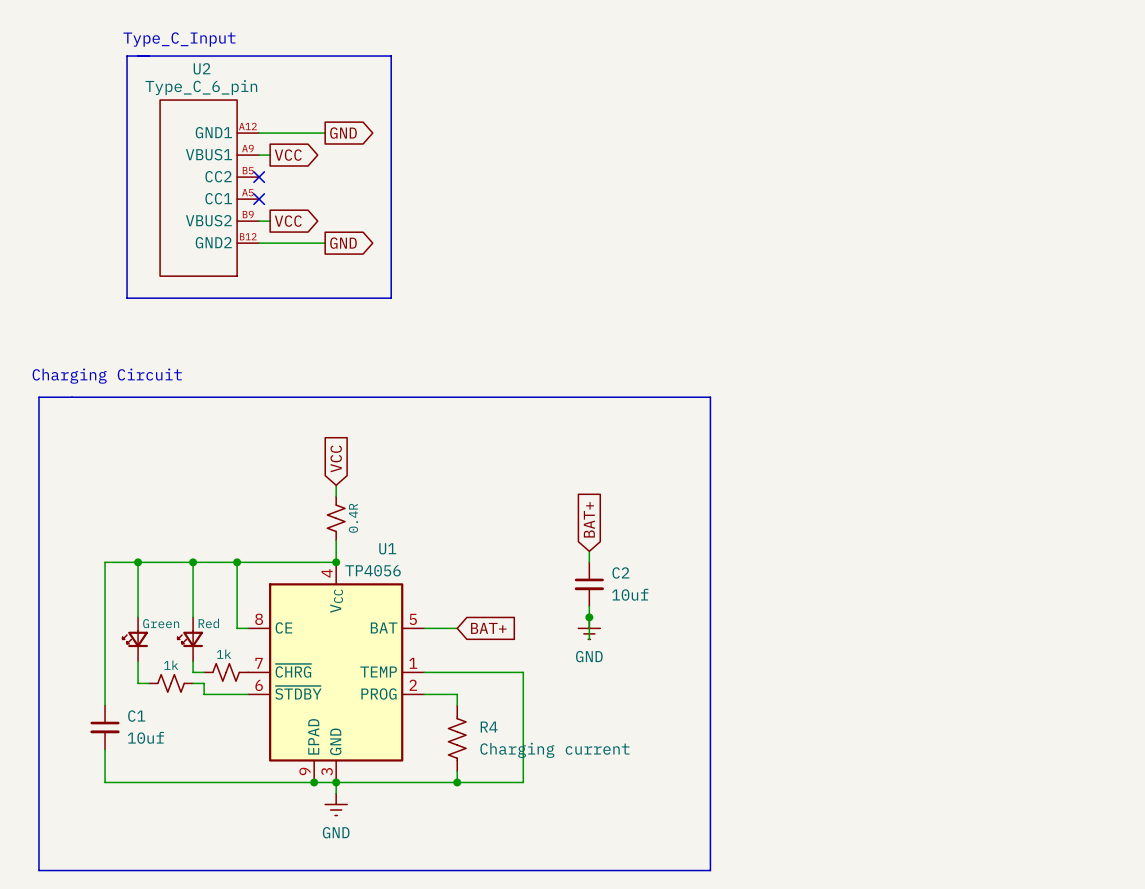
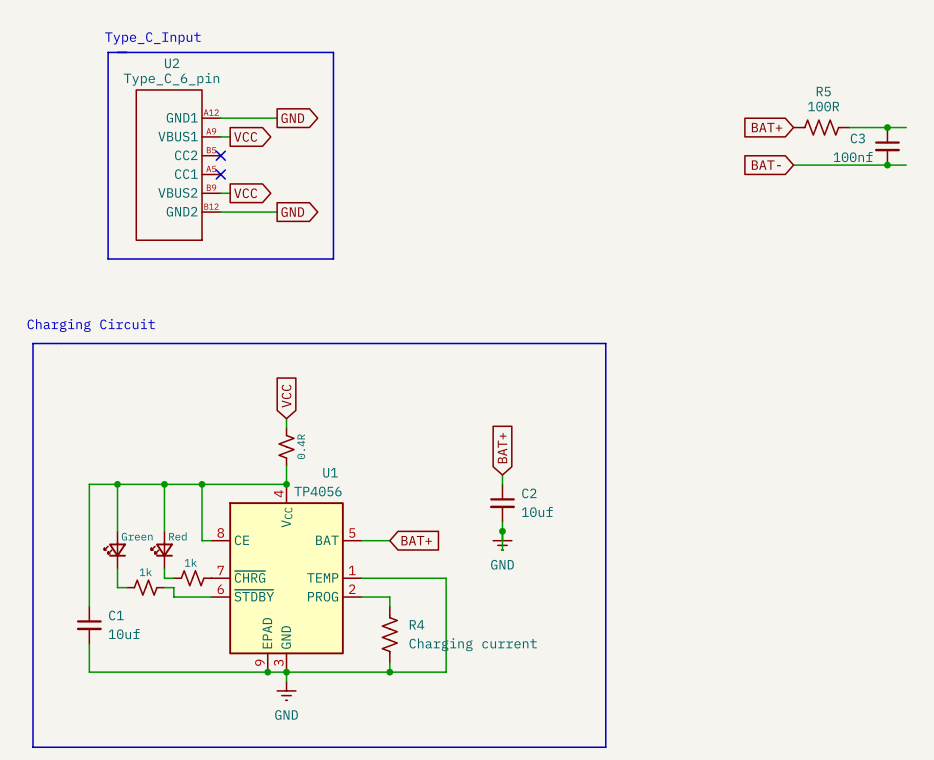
global label: none -> BAT+ (767, 127)
R5: none -> 100R (821, 127)
wire: none -> (849, 127) (906, 127)
junction: none -> (887, 127)
C3: none -> 100nf (887, 146)
global label: none -> BAT- (766, 165)
wire: none -> (793, 165) (906, 165)
junction: none -> (887, 165)

